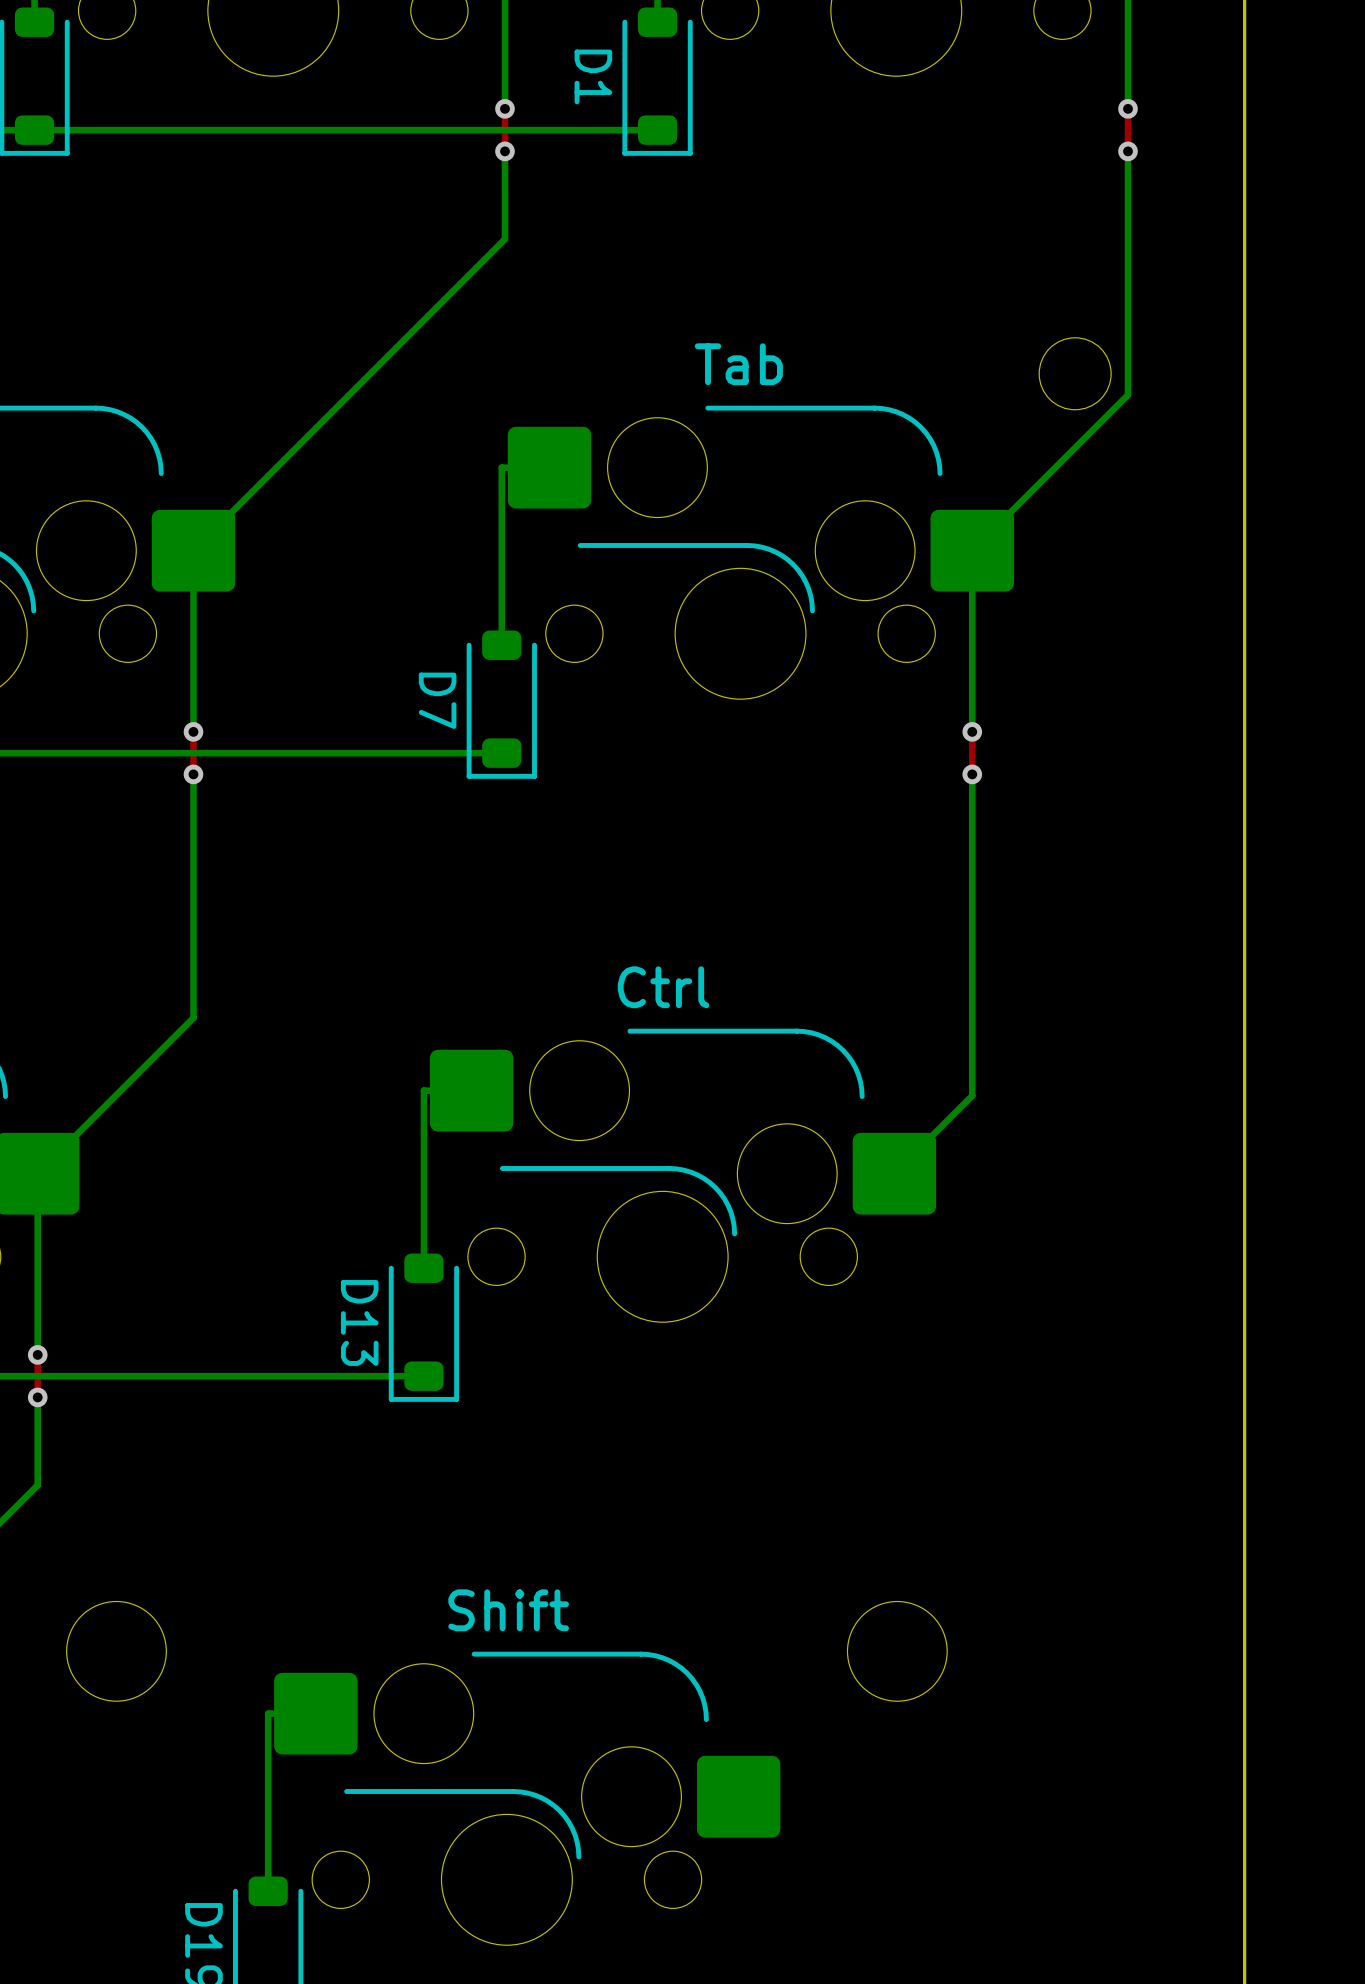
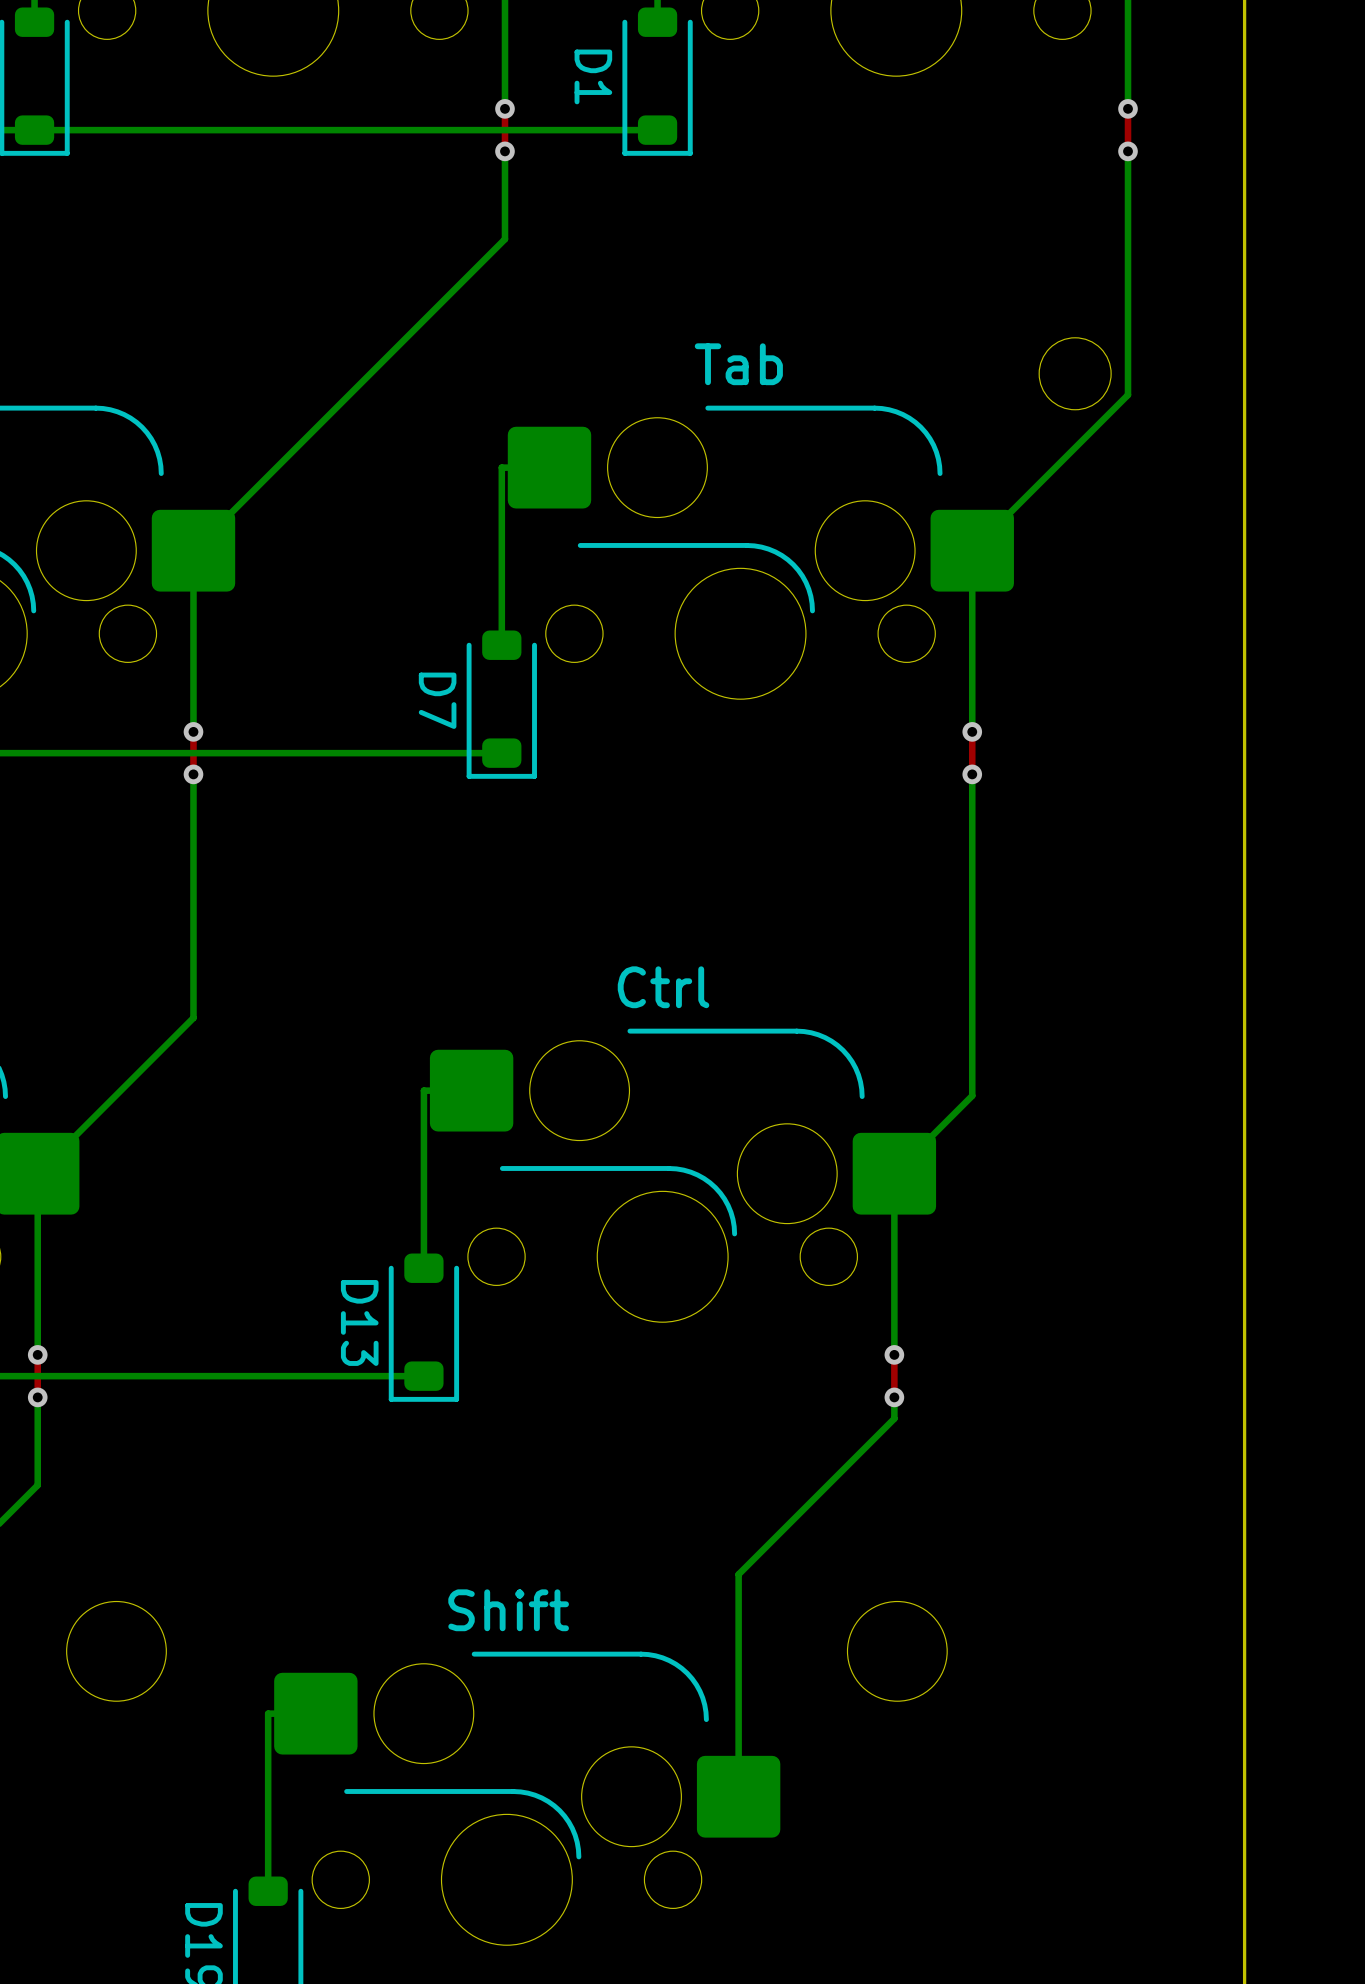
bottom track: none -> (894, 1173) (894, 1354)
top track: none -> (894, 1354) (894, 1397)
via: none -> (894, 1354)
bottom track: none -> (894, 1397) (894, 1418) (738, 1574) (738, 1796)
via: none -> (894, 1397)

